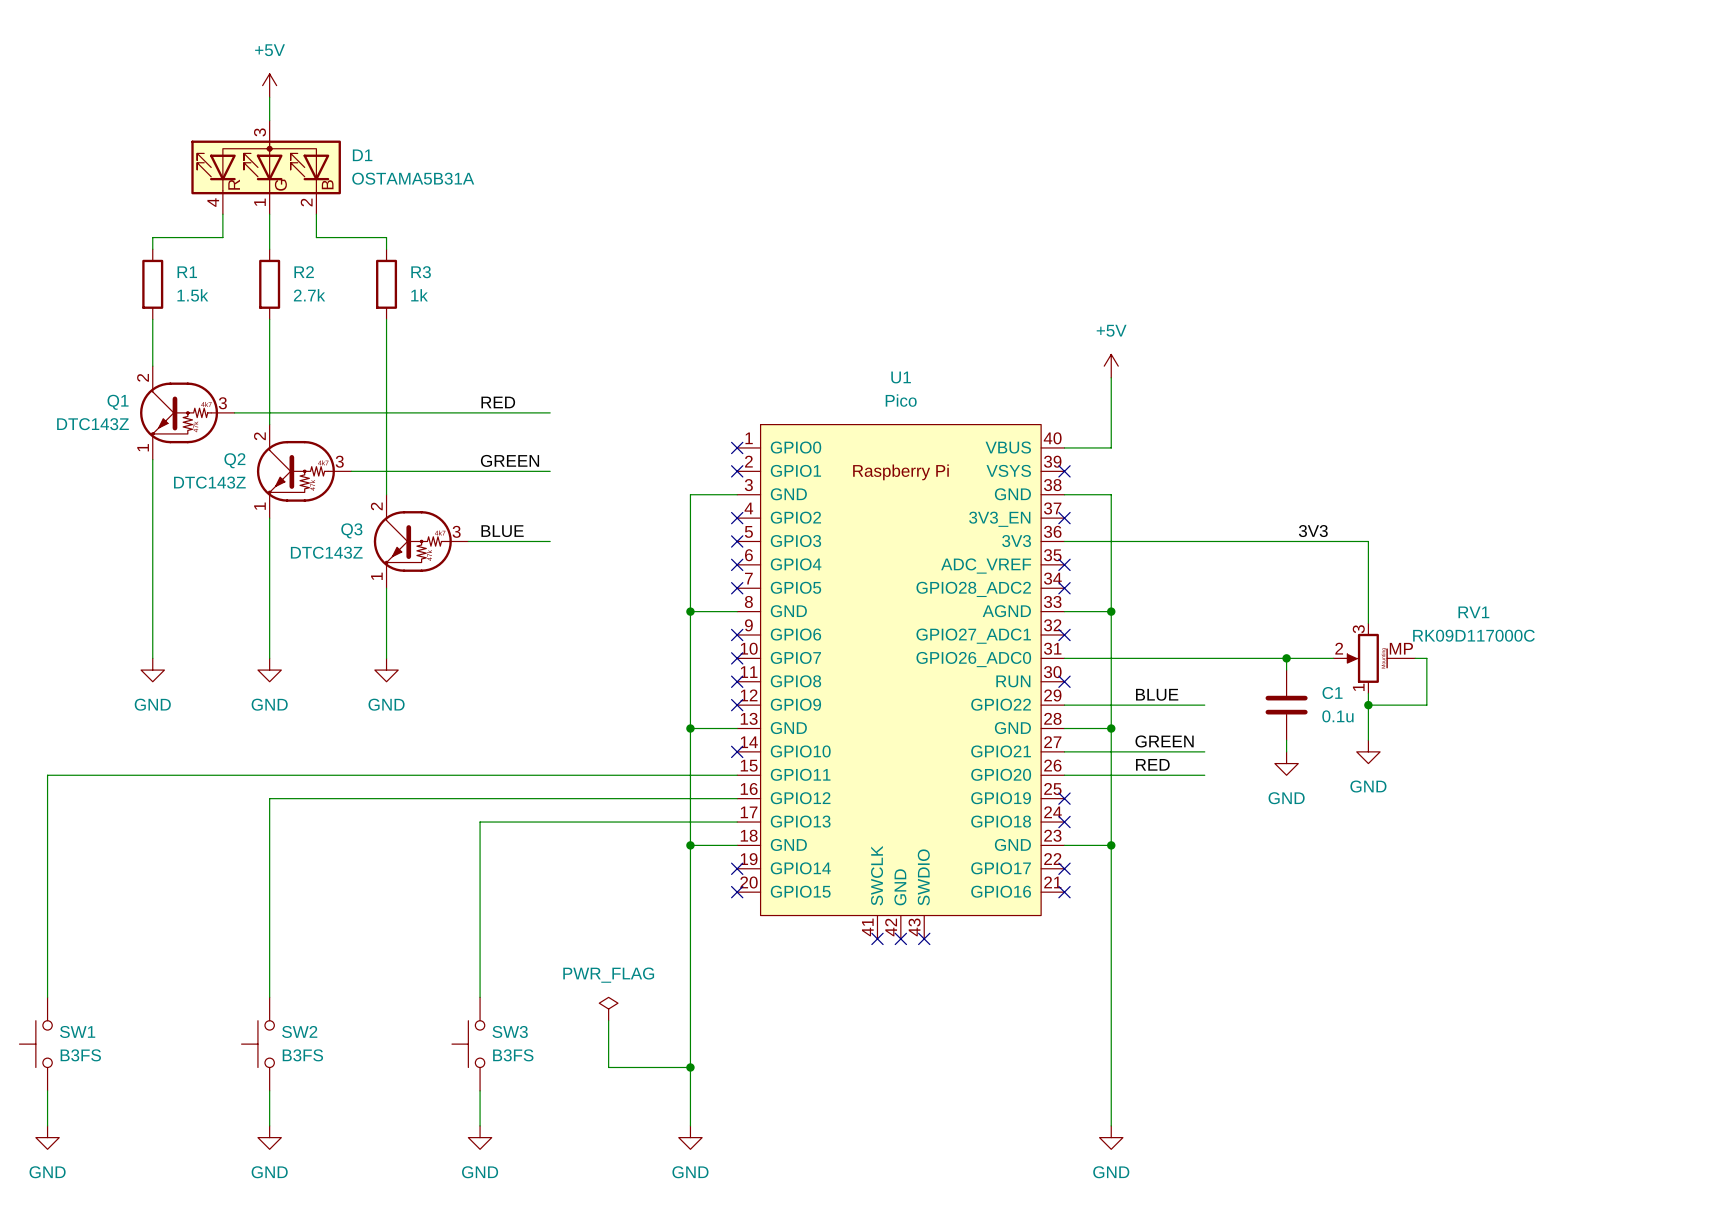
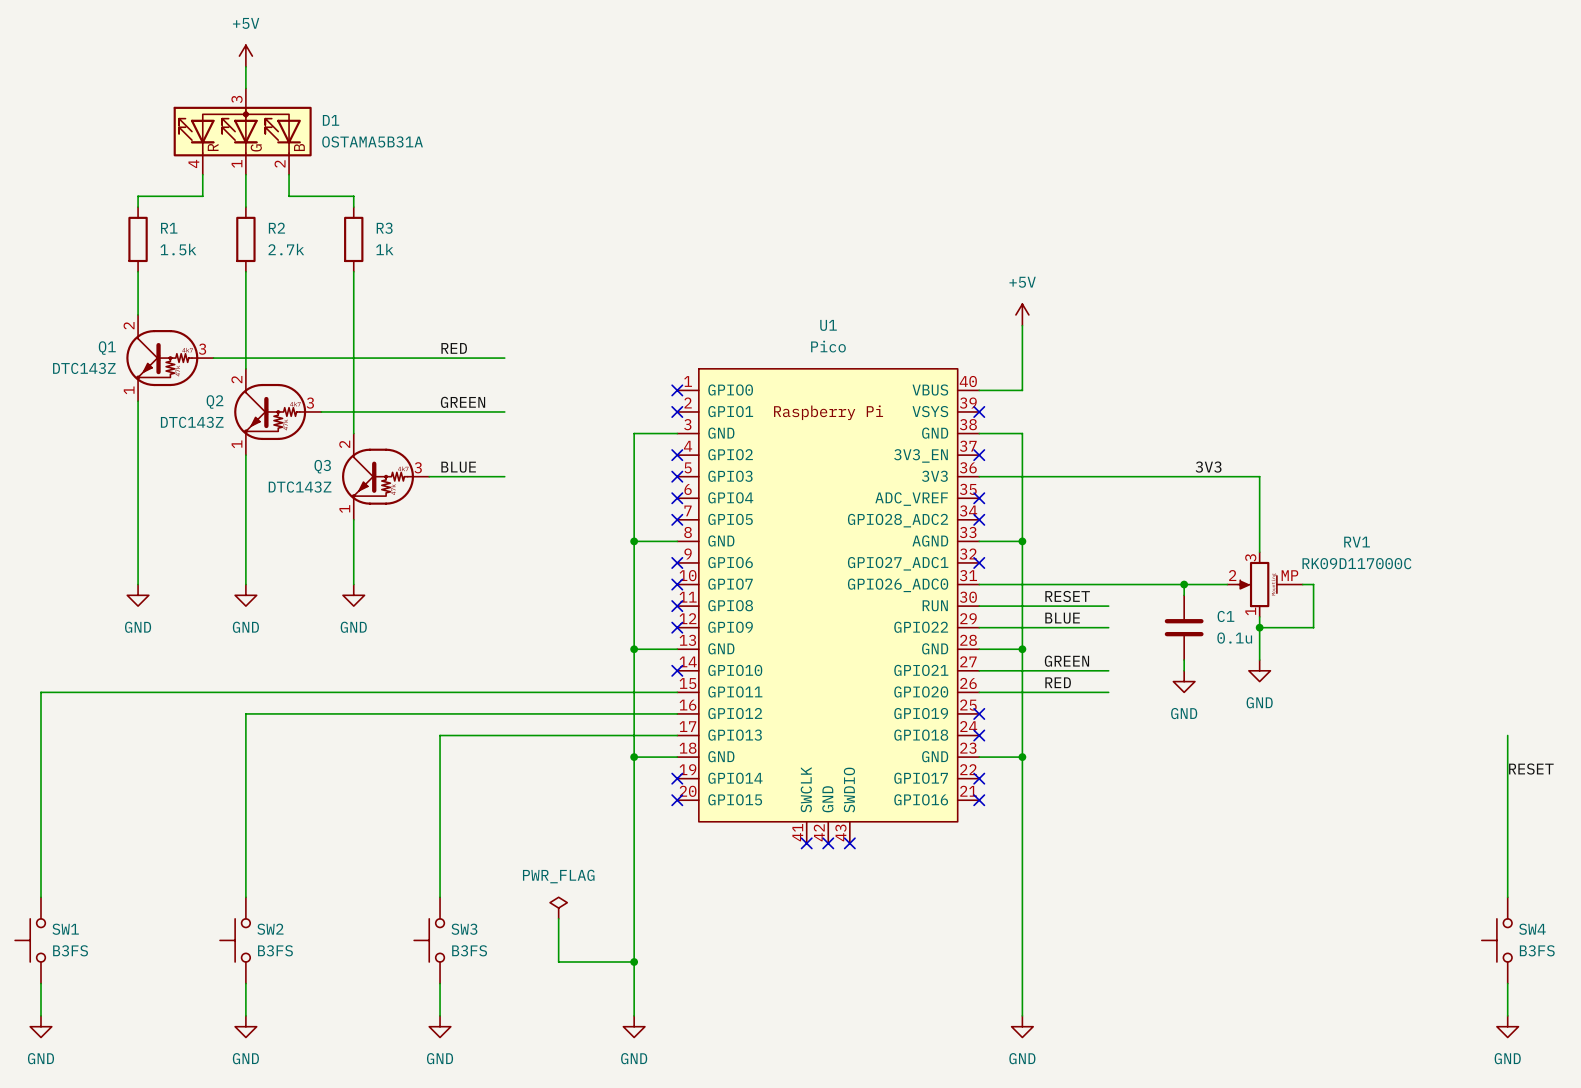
label: none -> RESET (1067, 596)
wire: none -> (979, 606) (1108, 606)
no-connect mark: (1064, 681) -> none
wire: none -> (1507, 735) (1507, 897)
label: none -> RESET (1531, 769)
SW4: none -> B3FS (1496, 940)
wire: none -> (1507, 983) (1507, 1015)
power symbol: none -> GND (1507, 1026)

